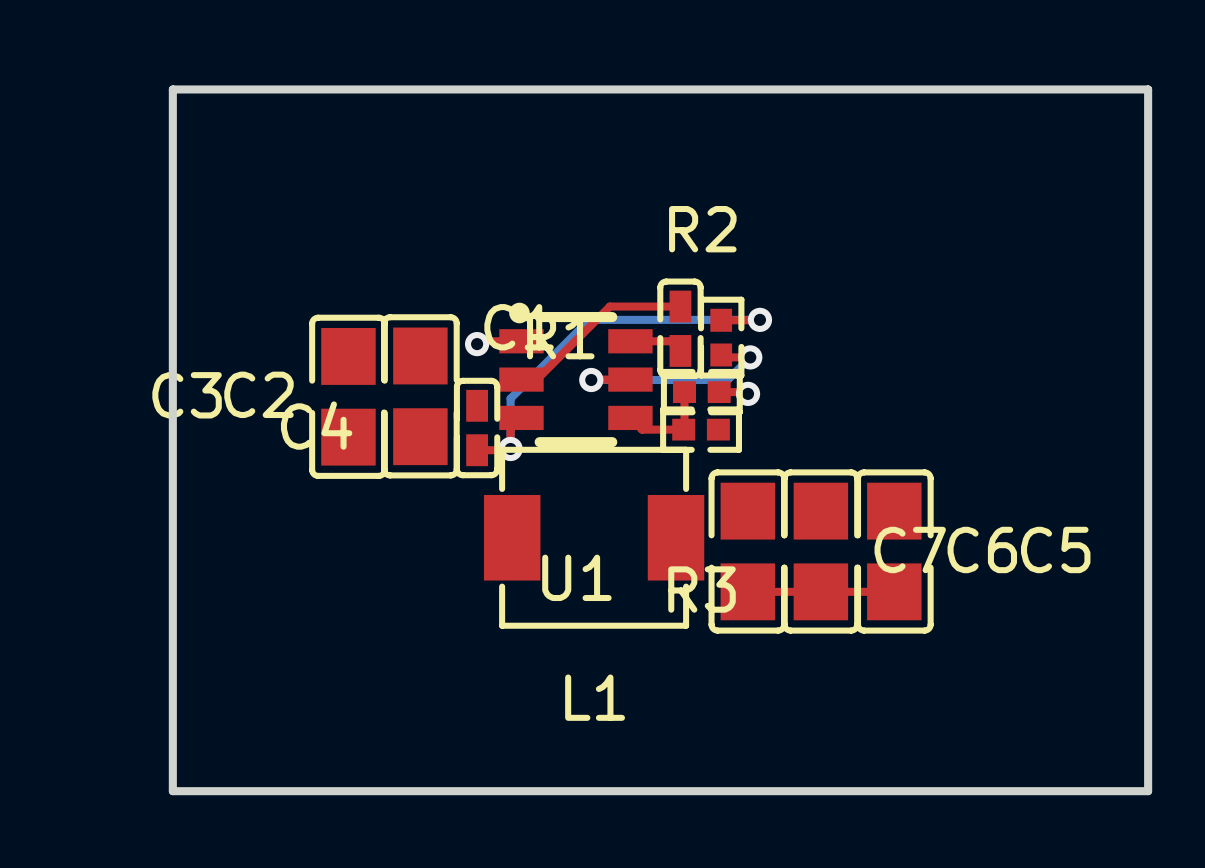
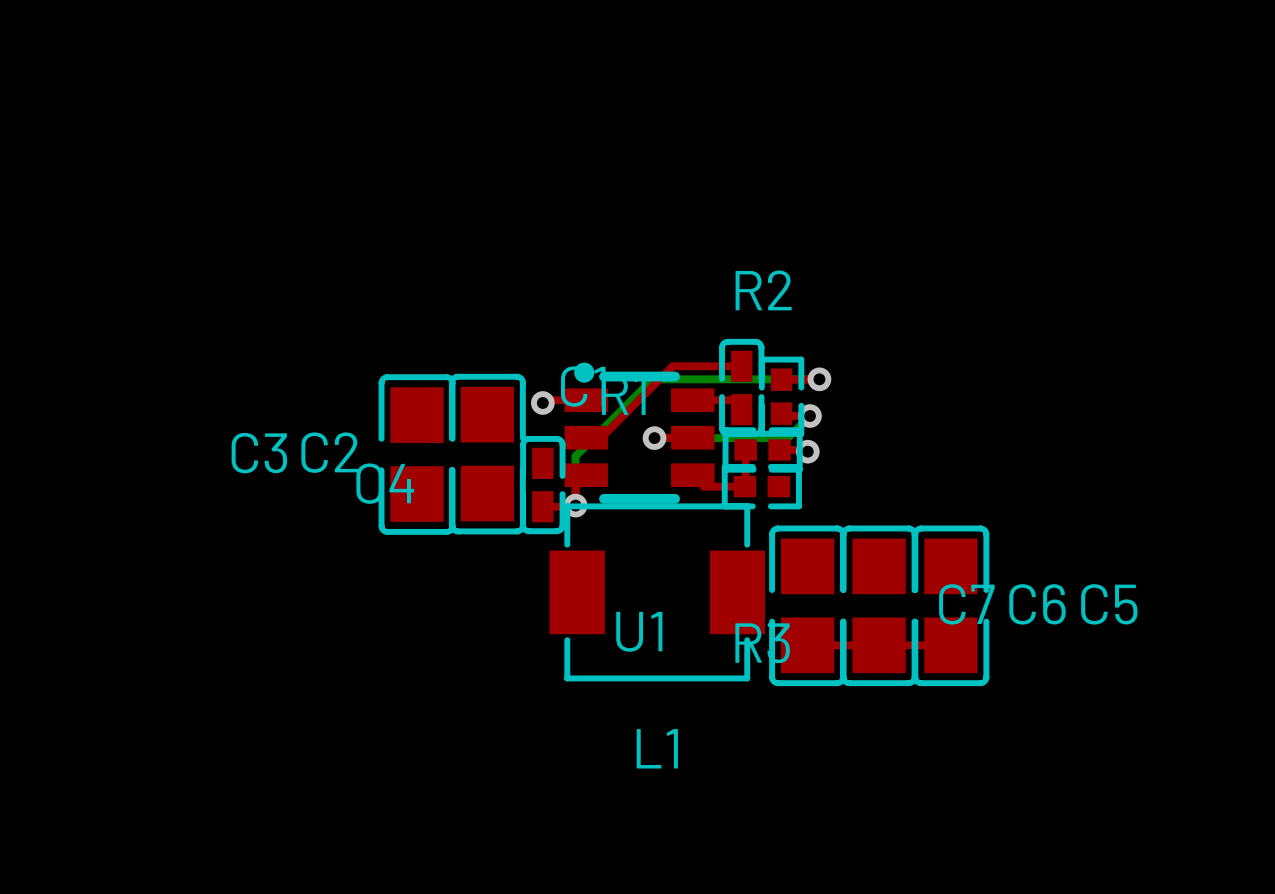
board edge: (172, 89) (1148, 89) (1148, 791) (172, 791) (172, 89) -> none

